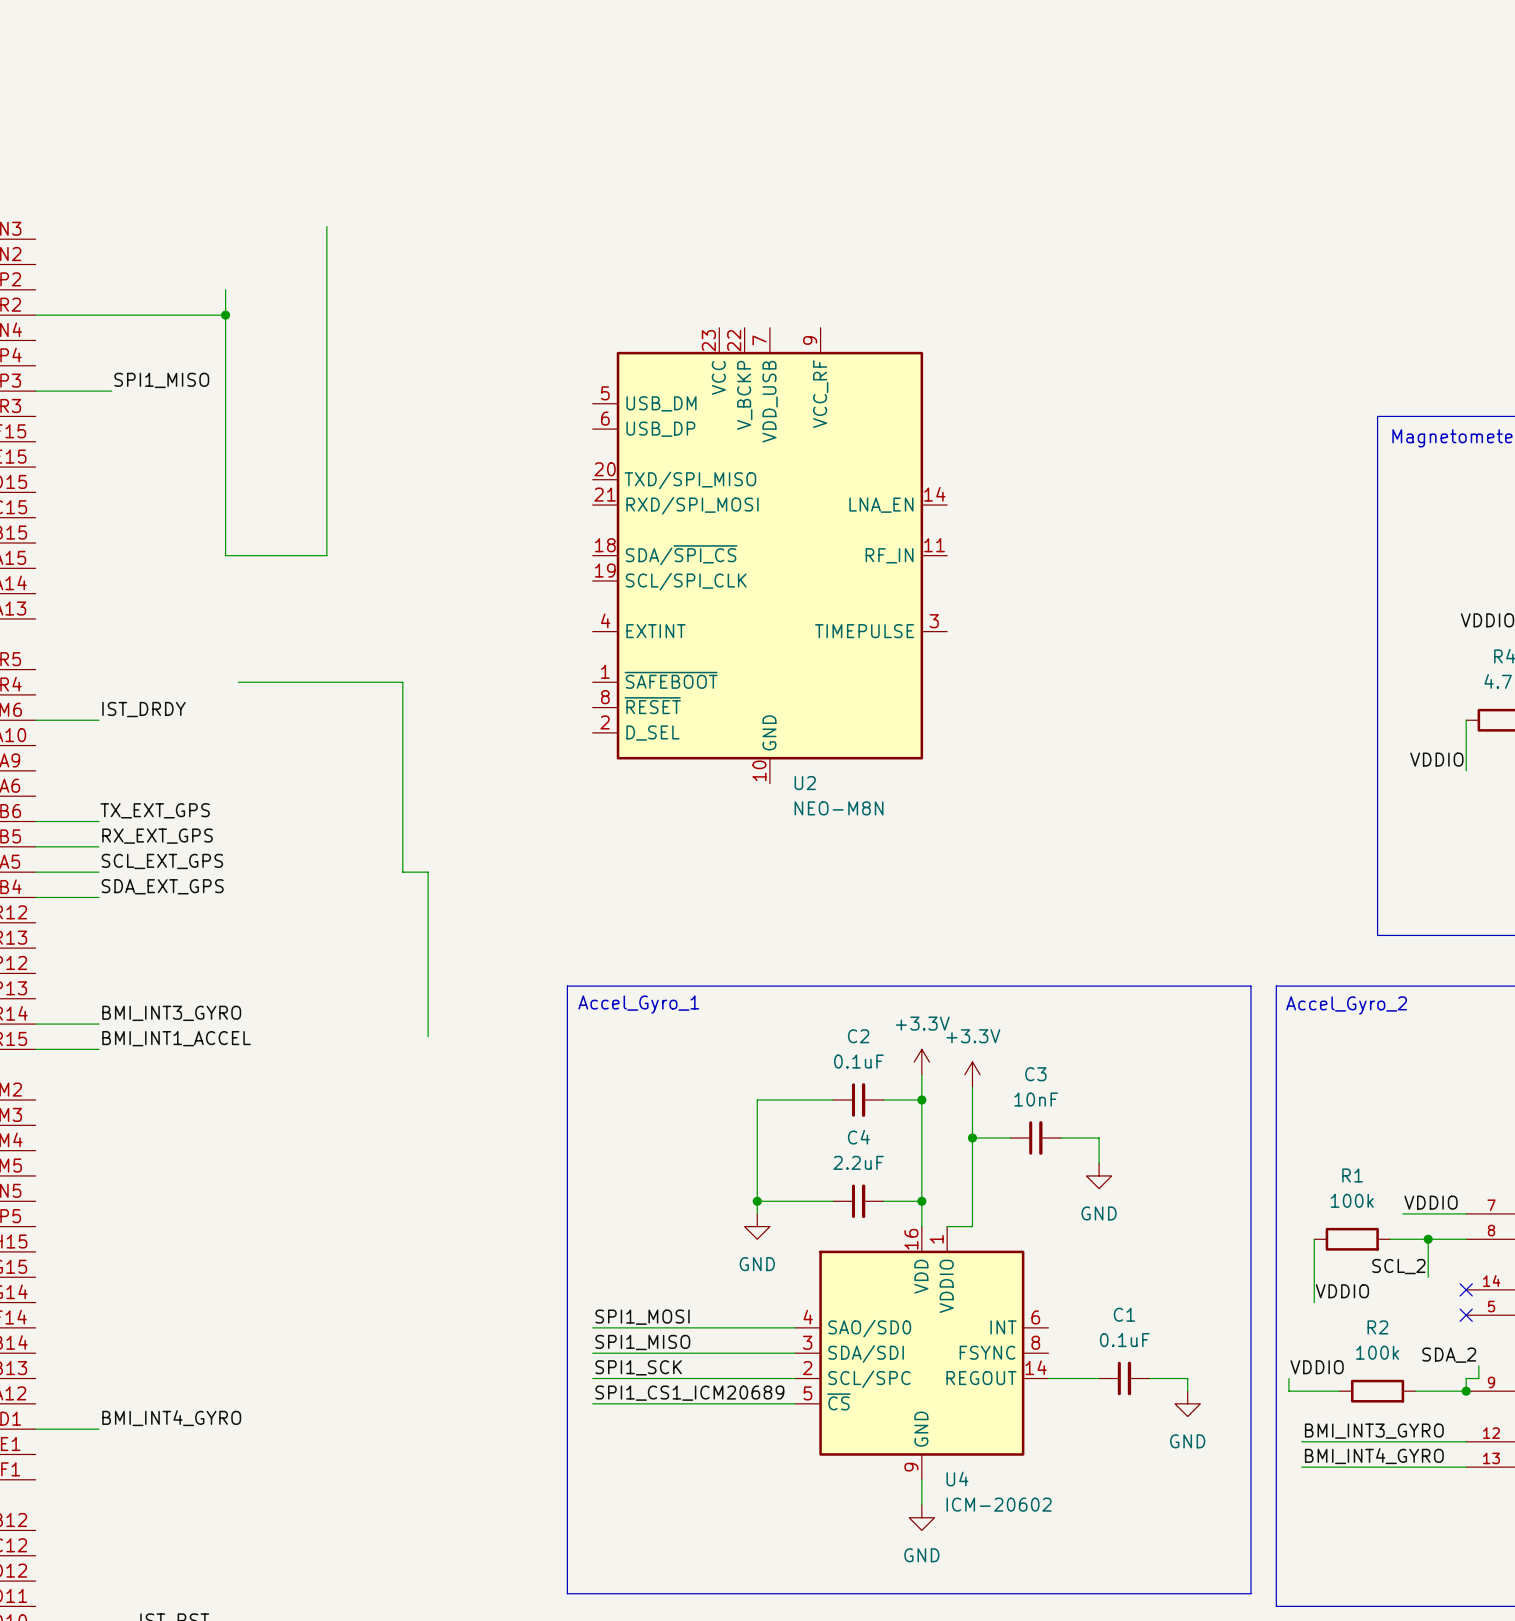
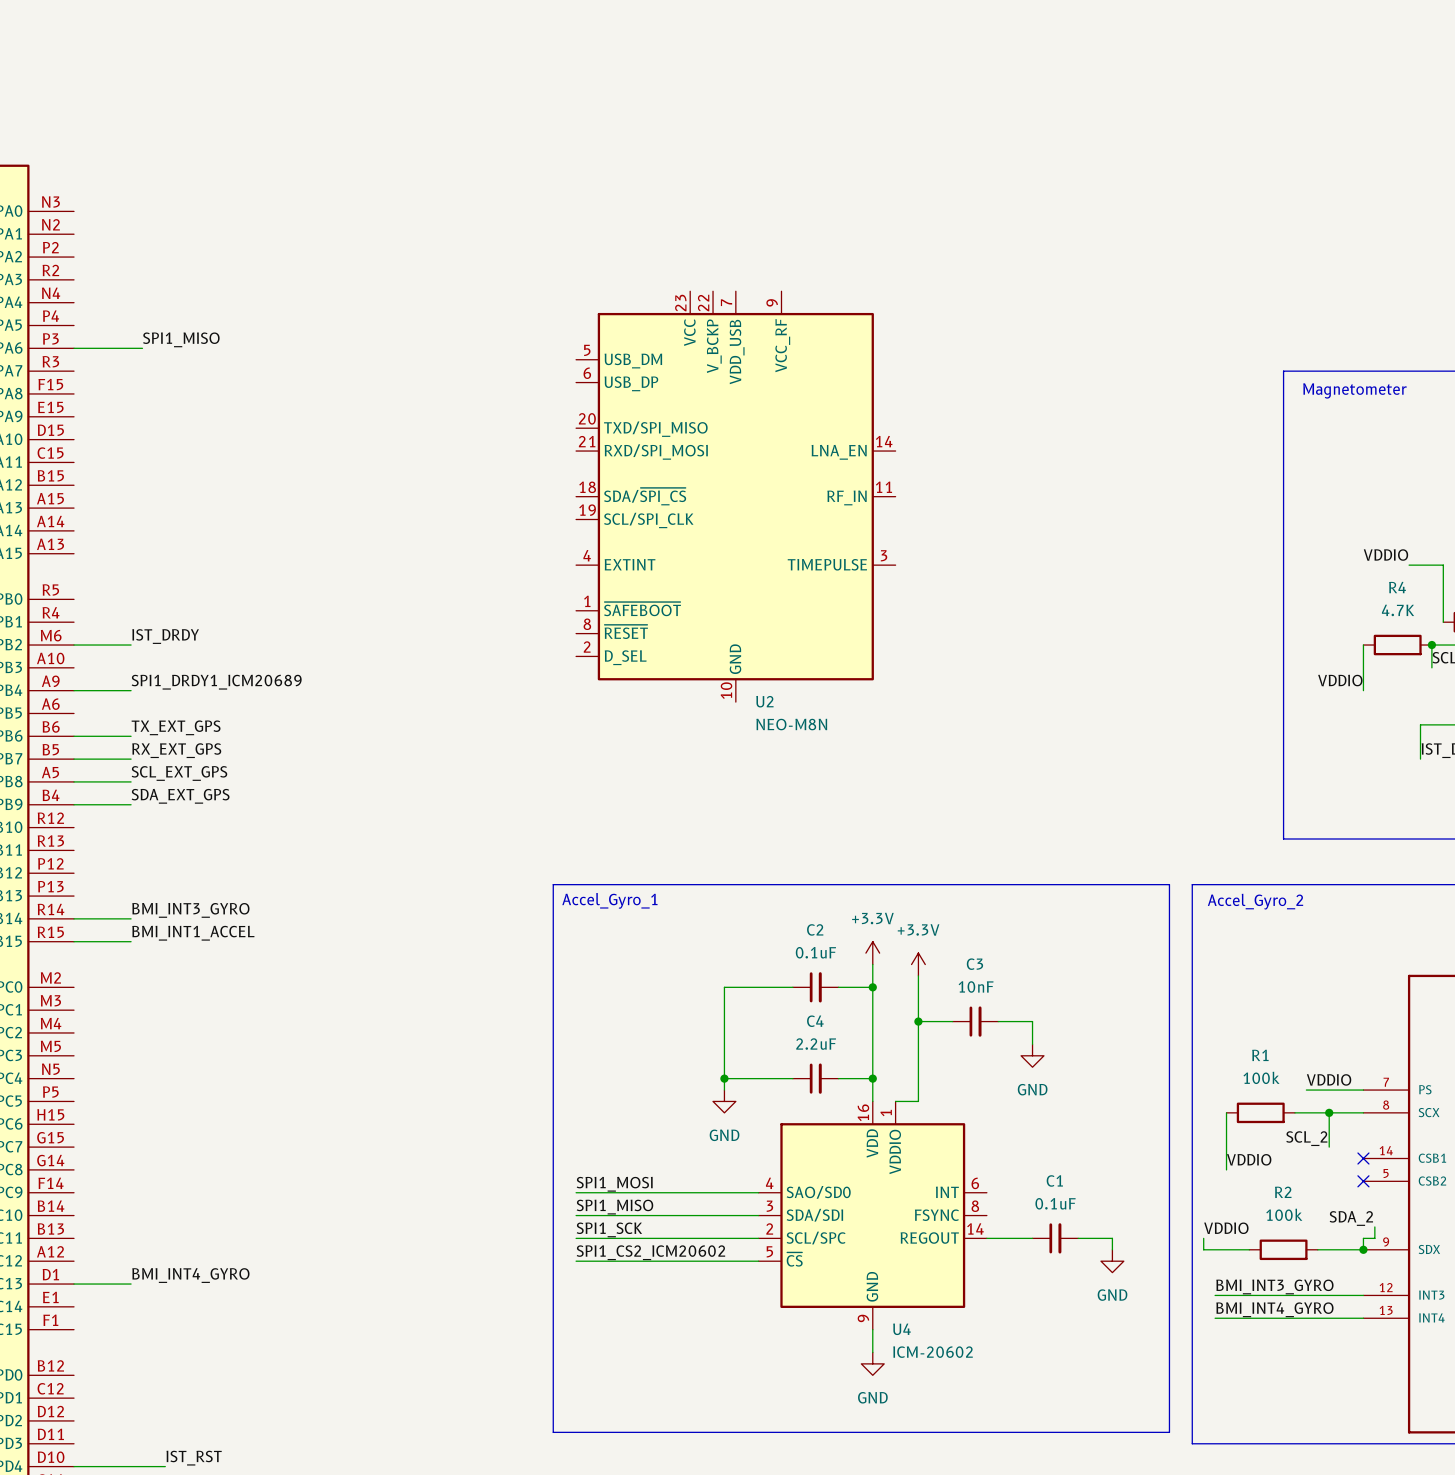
wire: (326, 226) (326, 555) (225, 555) (225, 289) -> none
wire: (35, 315) (225, 315) -> none
junction: (225, 315) -> none
wire: (238, 682) (402, 682) (402, 872) (428, 872) (428, 1036) -> none
label: none -> SPI1_DRDY1_ICM20689 (216, 682)
wire: none -> (74, 690) (131, 690)
label: SPI1_CS1_ICM20689 (689, 1393) -> SPI1_CS2_ICM20602 (650, 1252)

